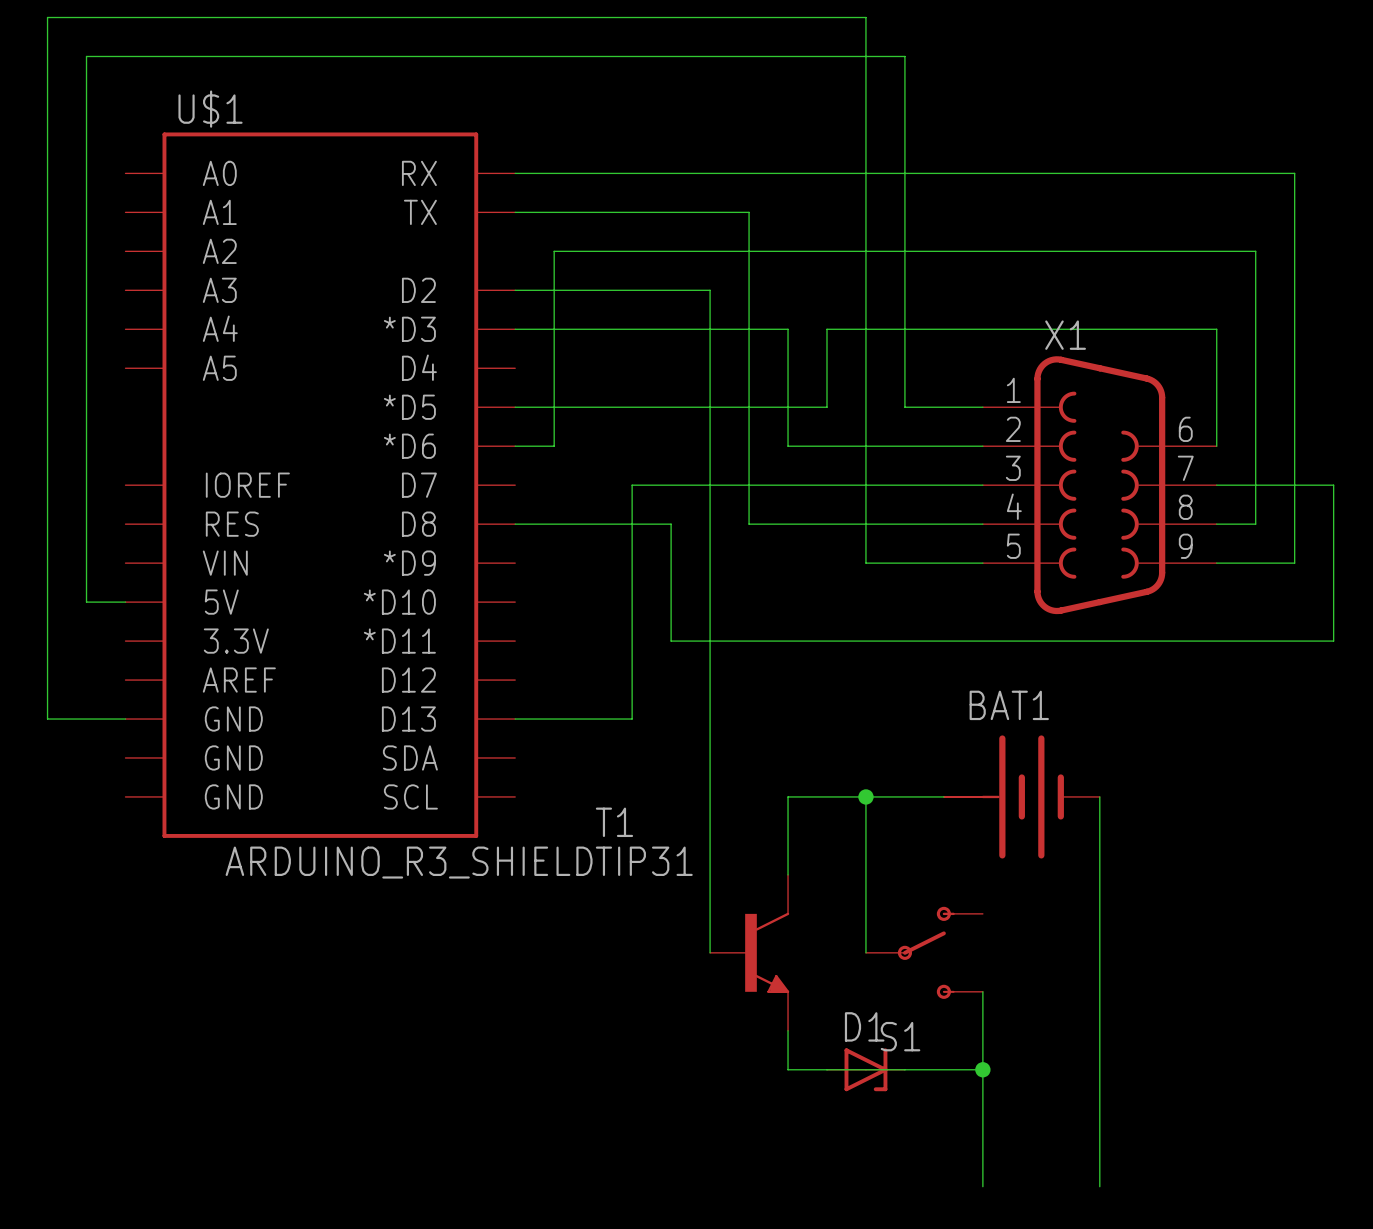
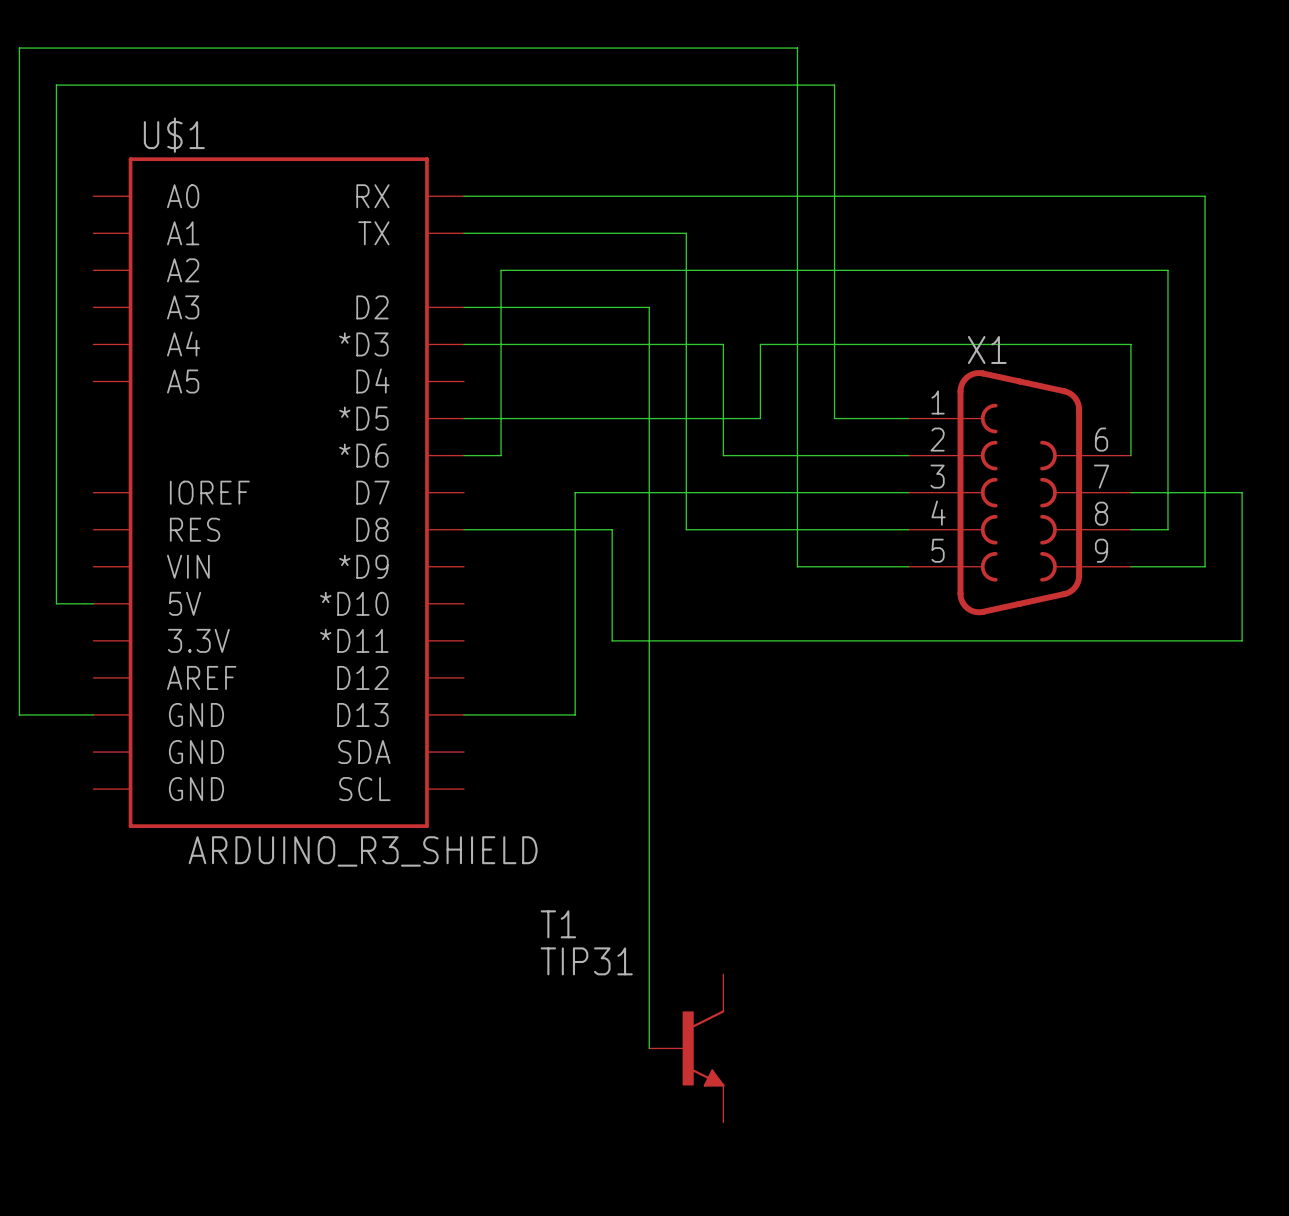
wire: (865, 796) (865, 952) -> none
junction: (865, 796) -> none
wire: (943, 796) (788, 796) (788, 874) -> none
BAT1: (1021, 796) -> none
wire: (1099, 796) (1099, 1186) -> none
wire: none -> (649, 937) (649, 1048)
T1 position: (749, 952) -> (686, 1048)
S1: (924, 952) -> none
wire: (982, 991) (982, 1186) -> none
wire: (788, 1030) (788, 1069) (982, 1069) -> none
D1: (865, 1069) -> none
junction: (982, 1069) -> none

